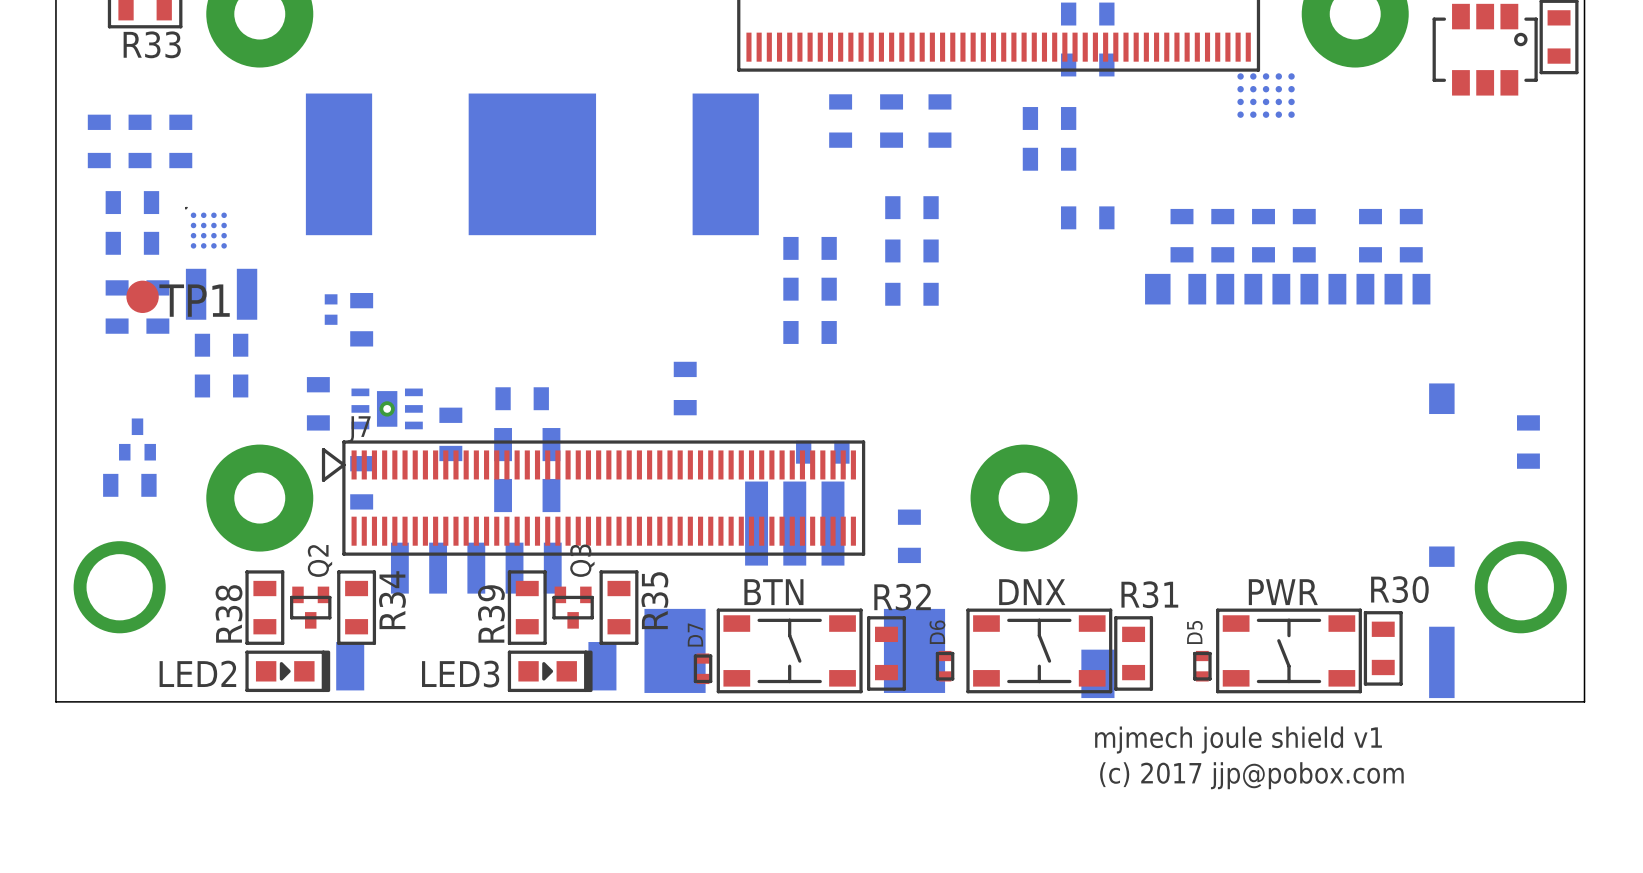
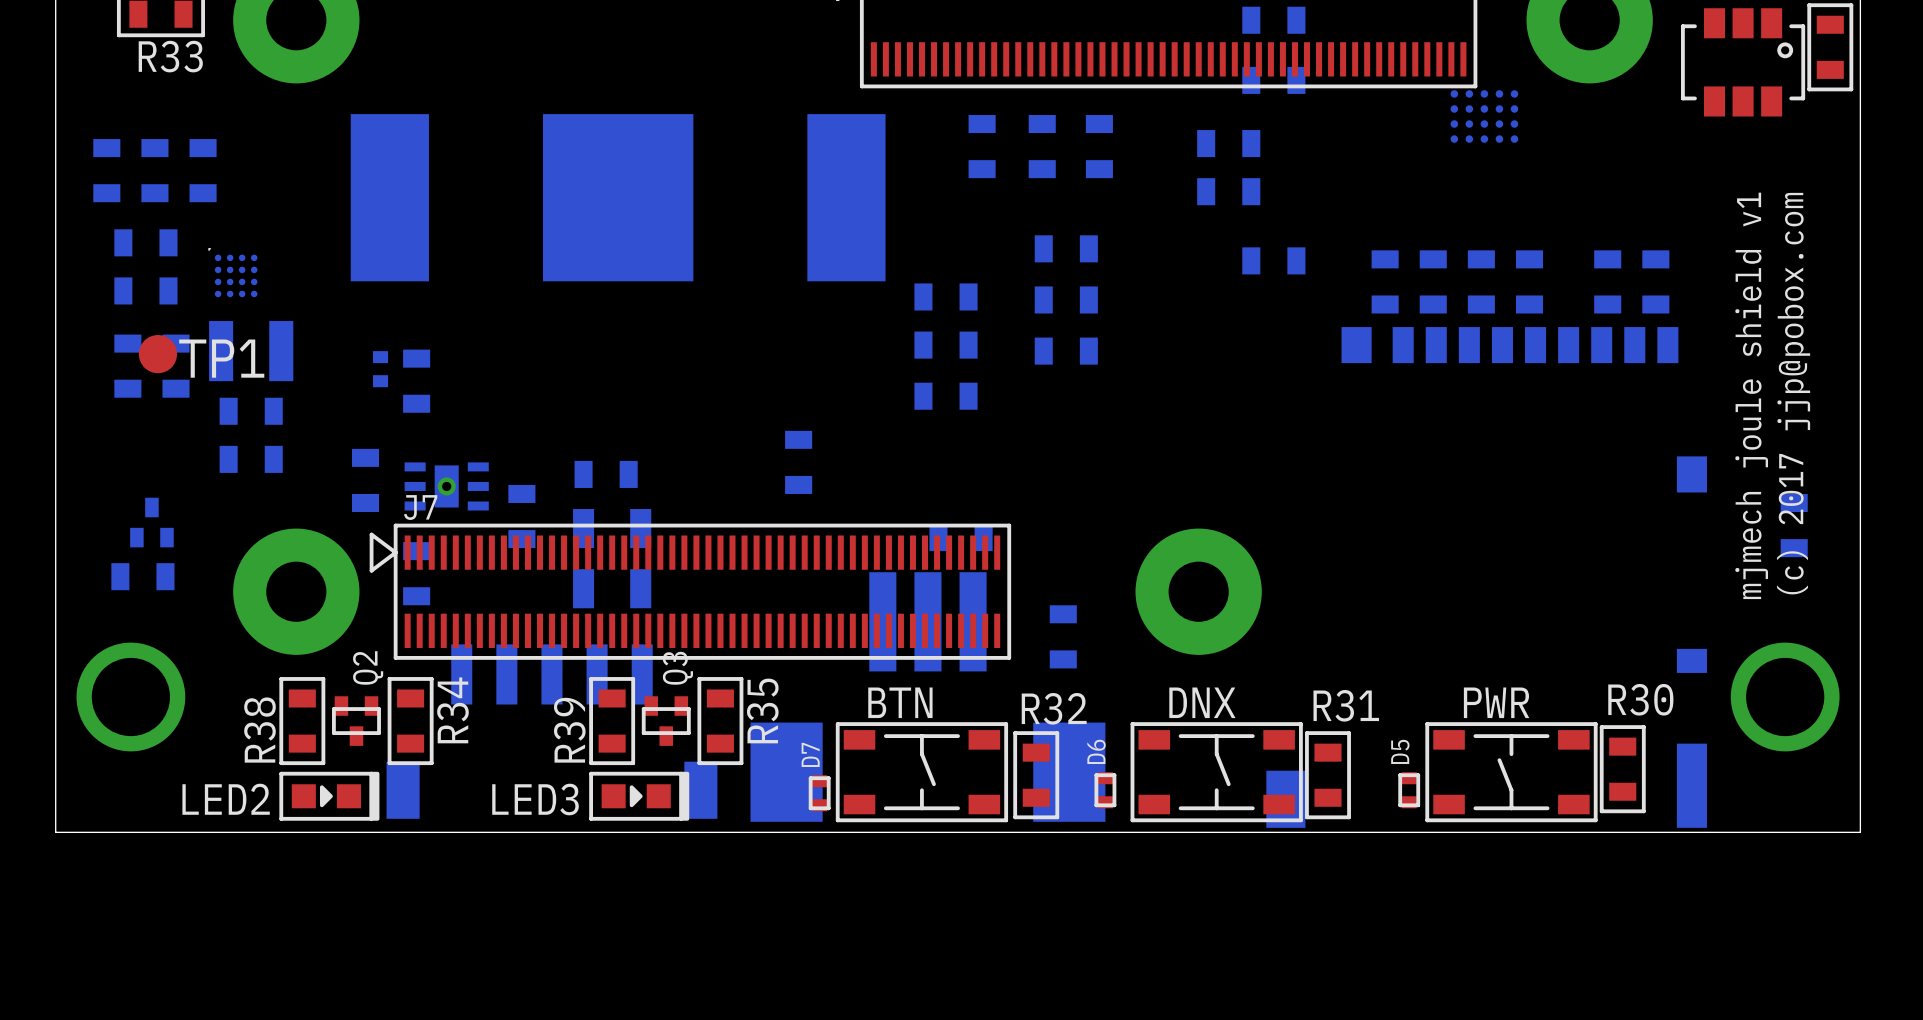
text rotation: 0° (1238, 740) -> 90° counterclockwise (1751, 395)
text position: mjmech joule shield v1 (1238, 740) -> mjmech joule shield v1 (1751, 395)
text rotation: 0° (1251, 775) -> 90° counterclockwise (1793, 393)
text position: (c) 2017 jjp@pobox.com (1251, 775) -> (c) 2017 jjp@pobox.com (1793, 393)

